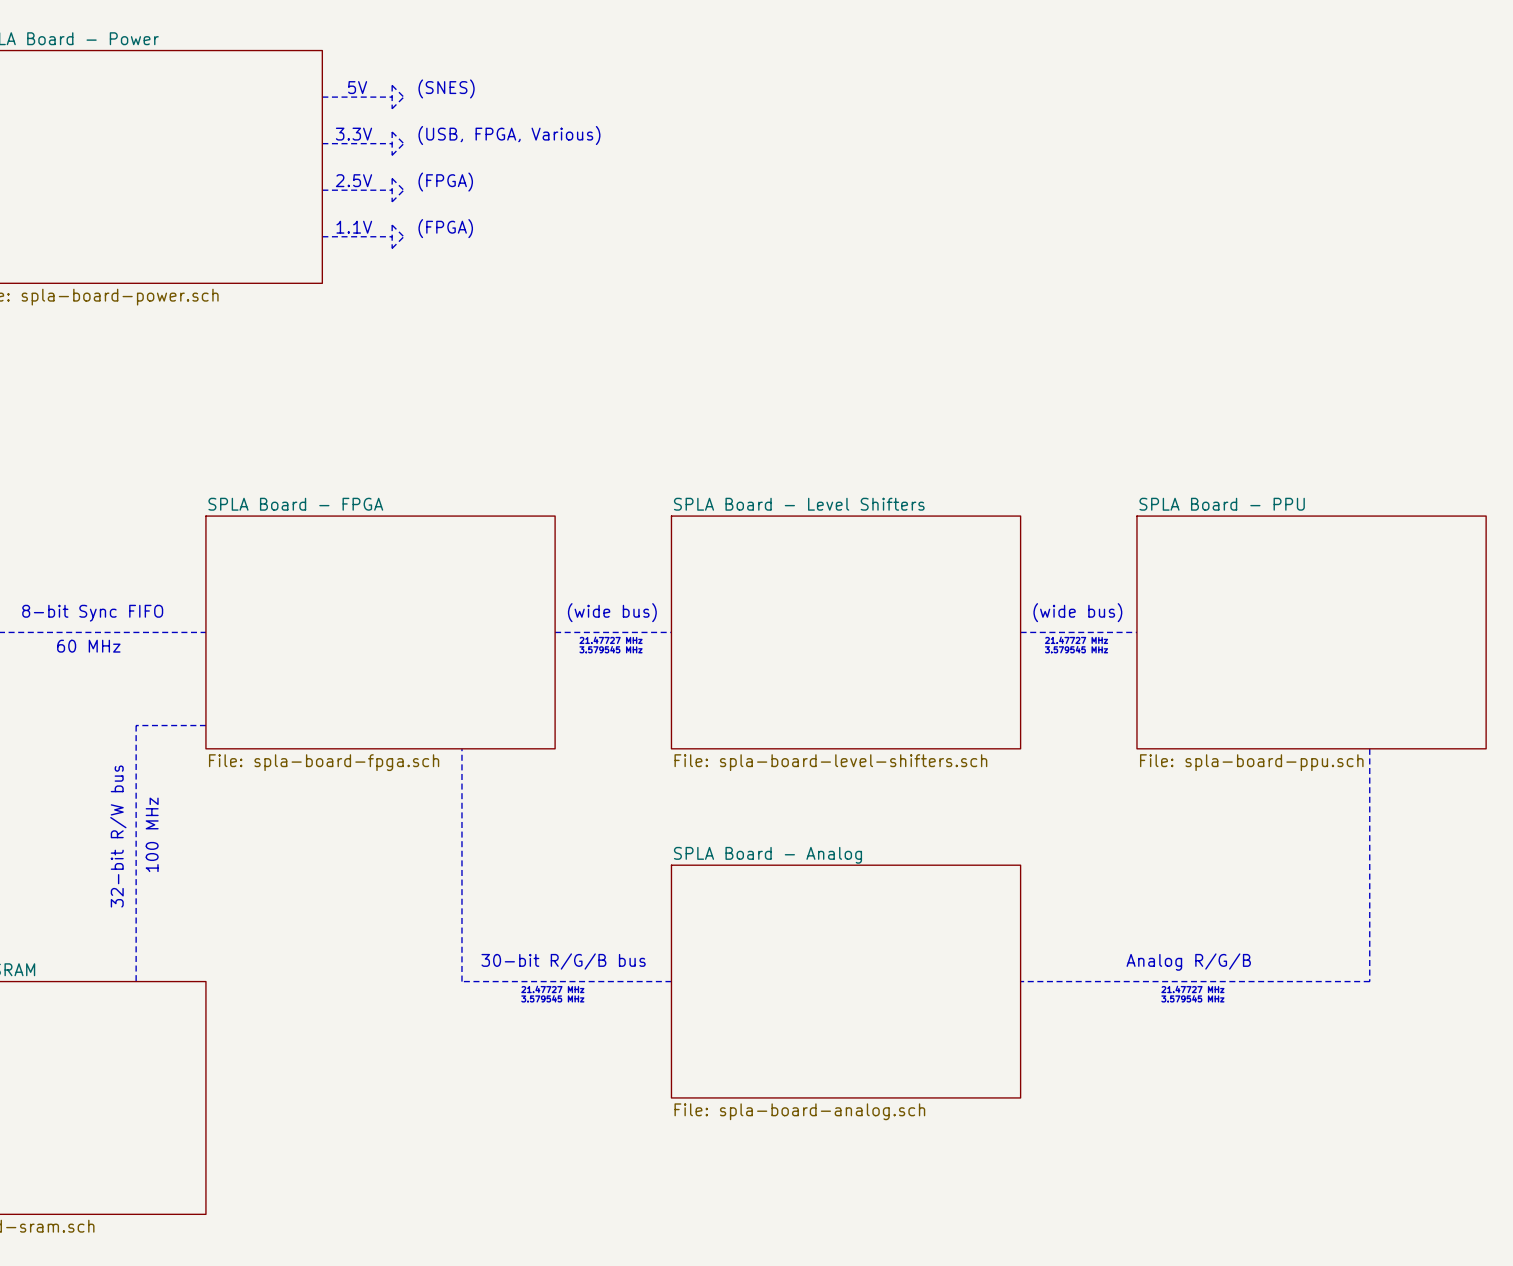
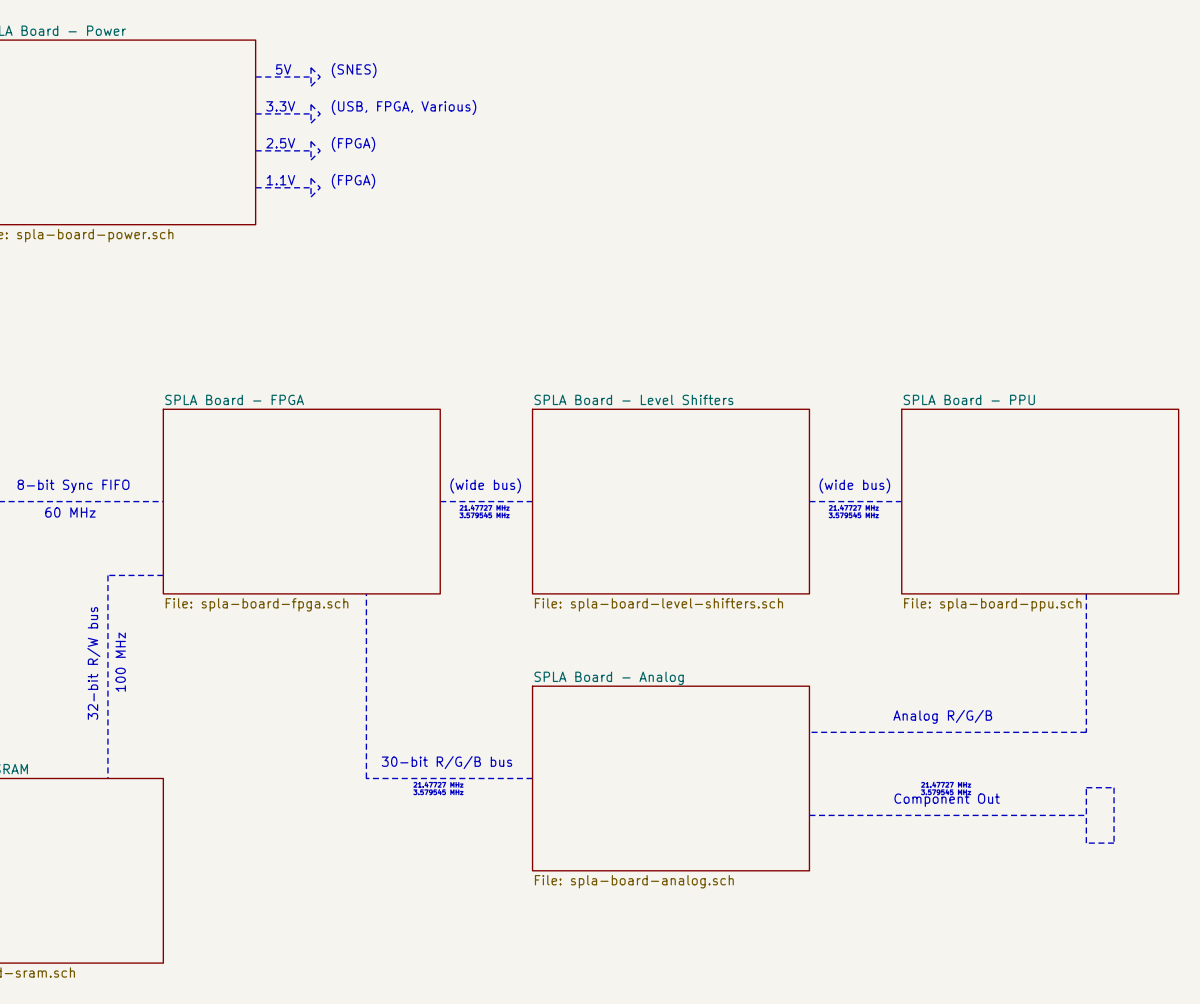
line: (1369, 923) (1369, 981) (1020, 981) -> (1086, 732) (809, 732)
text position: Analog R/G/B (1188, 962) -> Analog R/G/B (942, 716)
line: none -> (1086, 787) (1086, 843) (1114, 843) (1114, 787) (1086, 787)
text: none -> Component Out (947, 800)
line: none -> (809, 815) (1086, 815)

